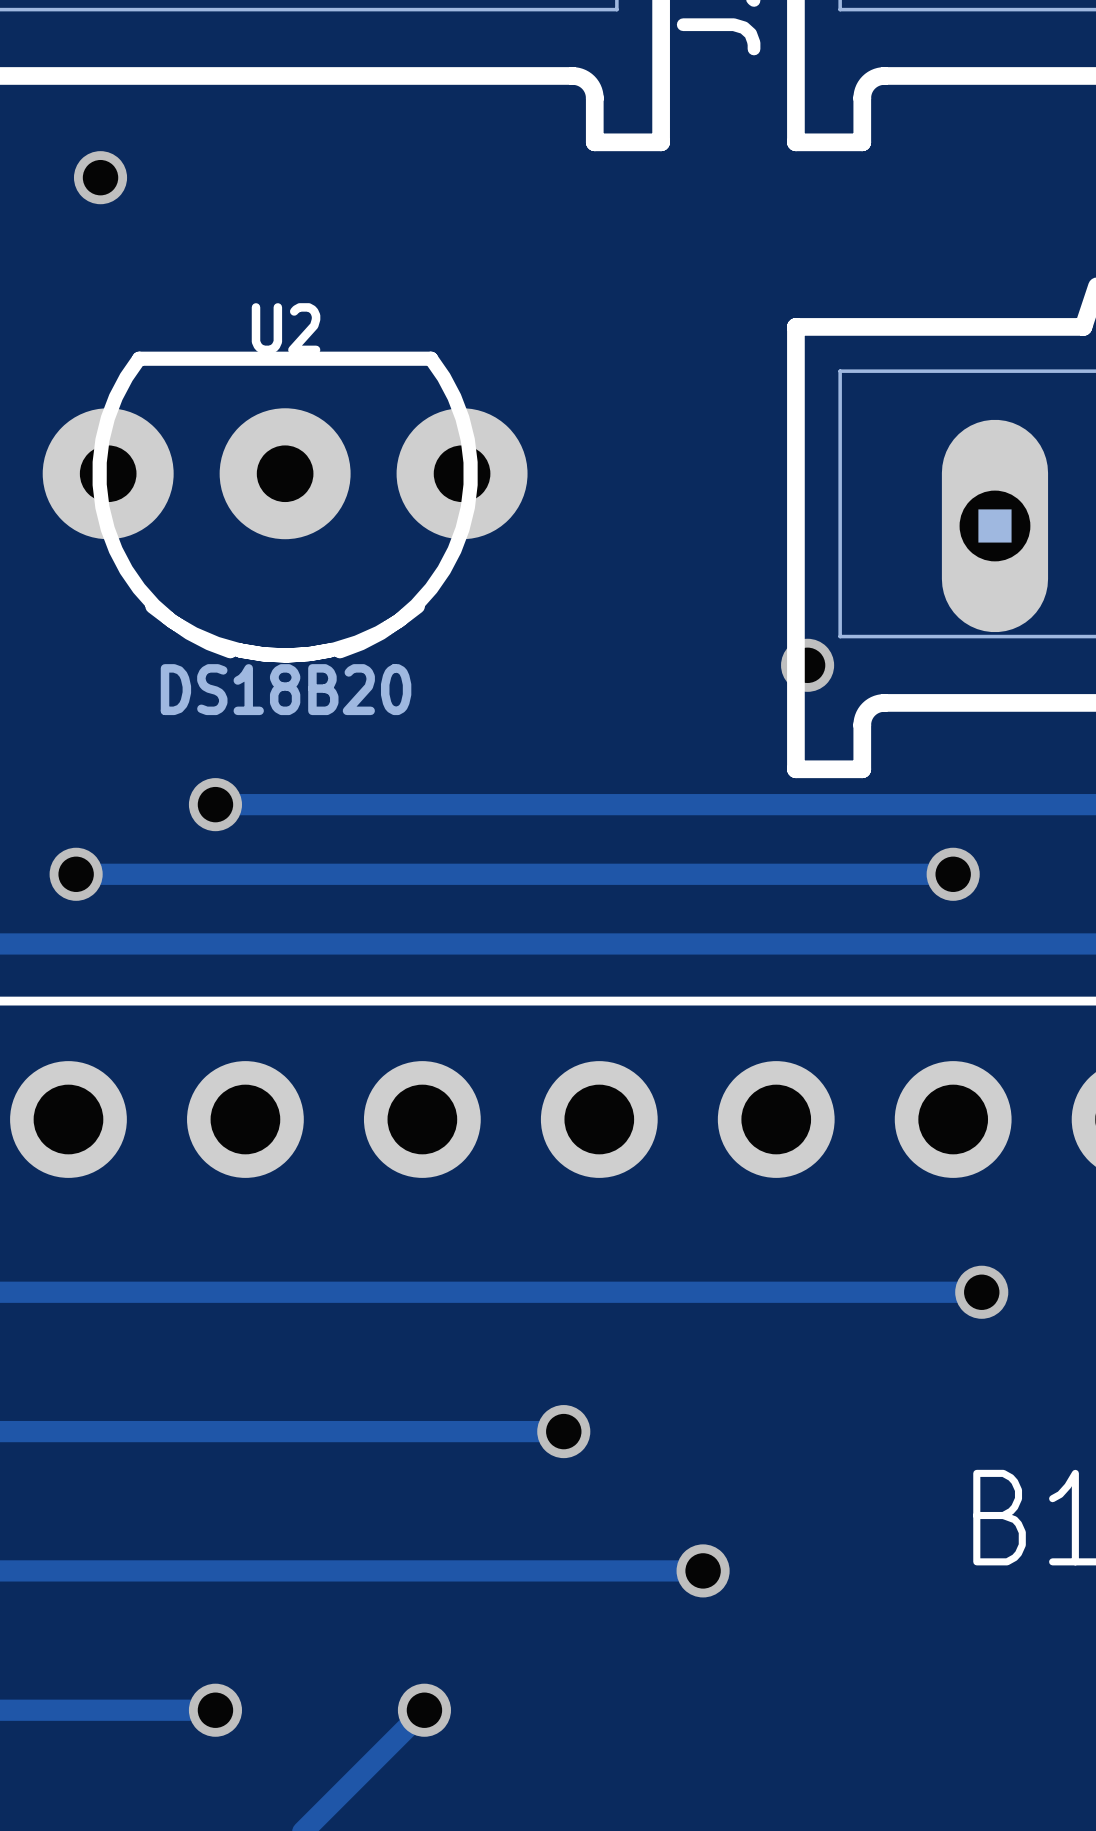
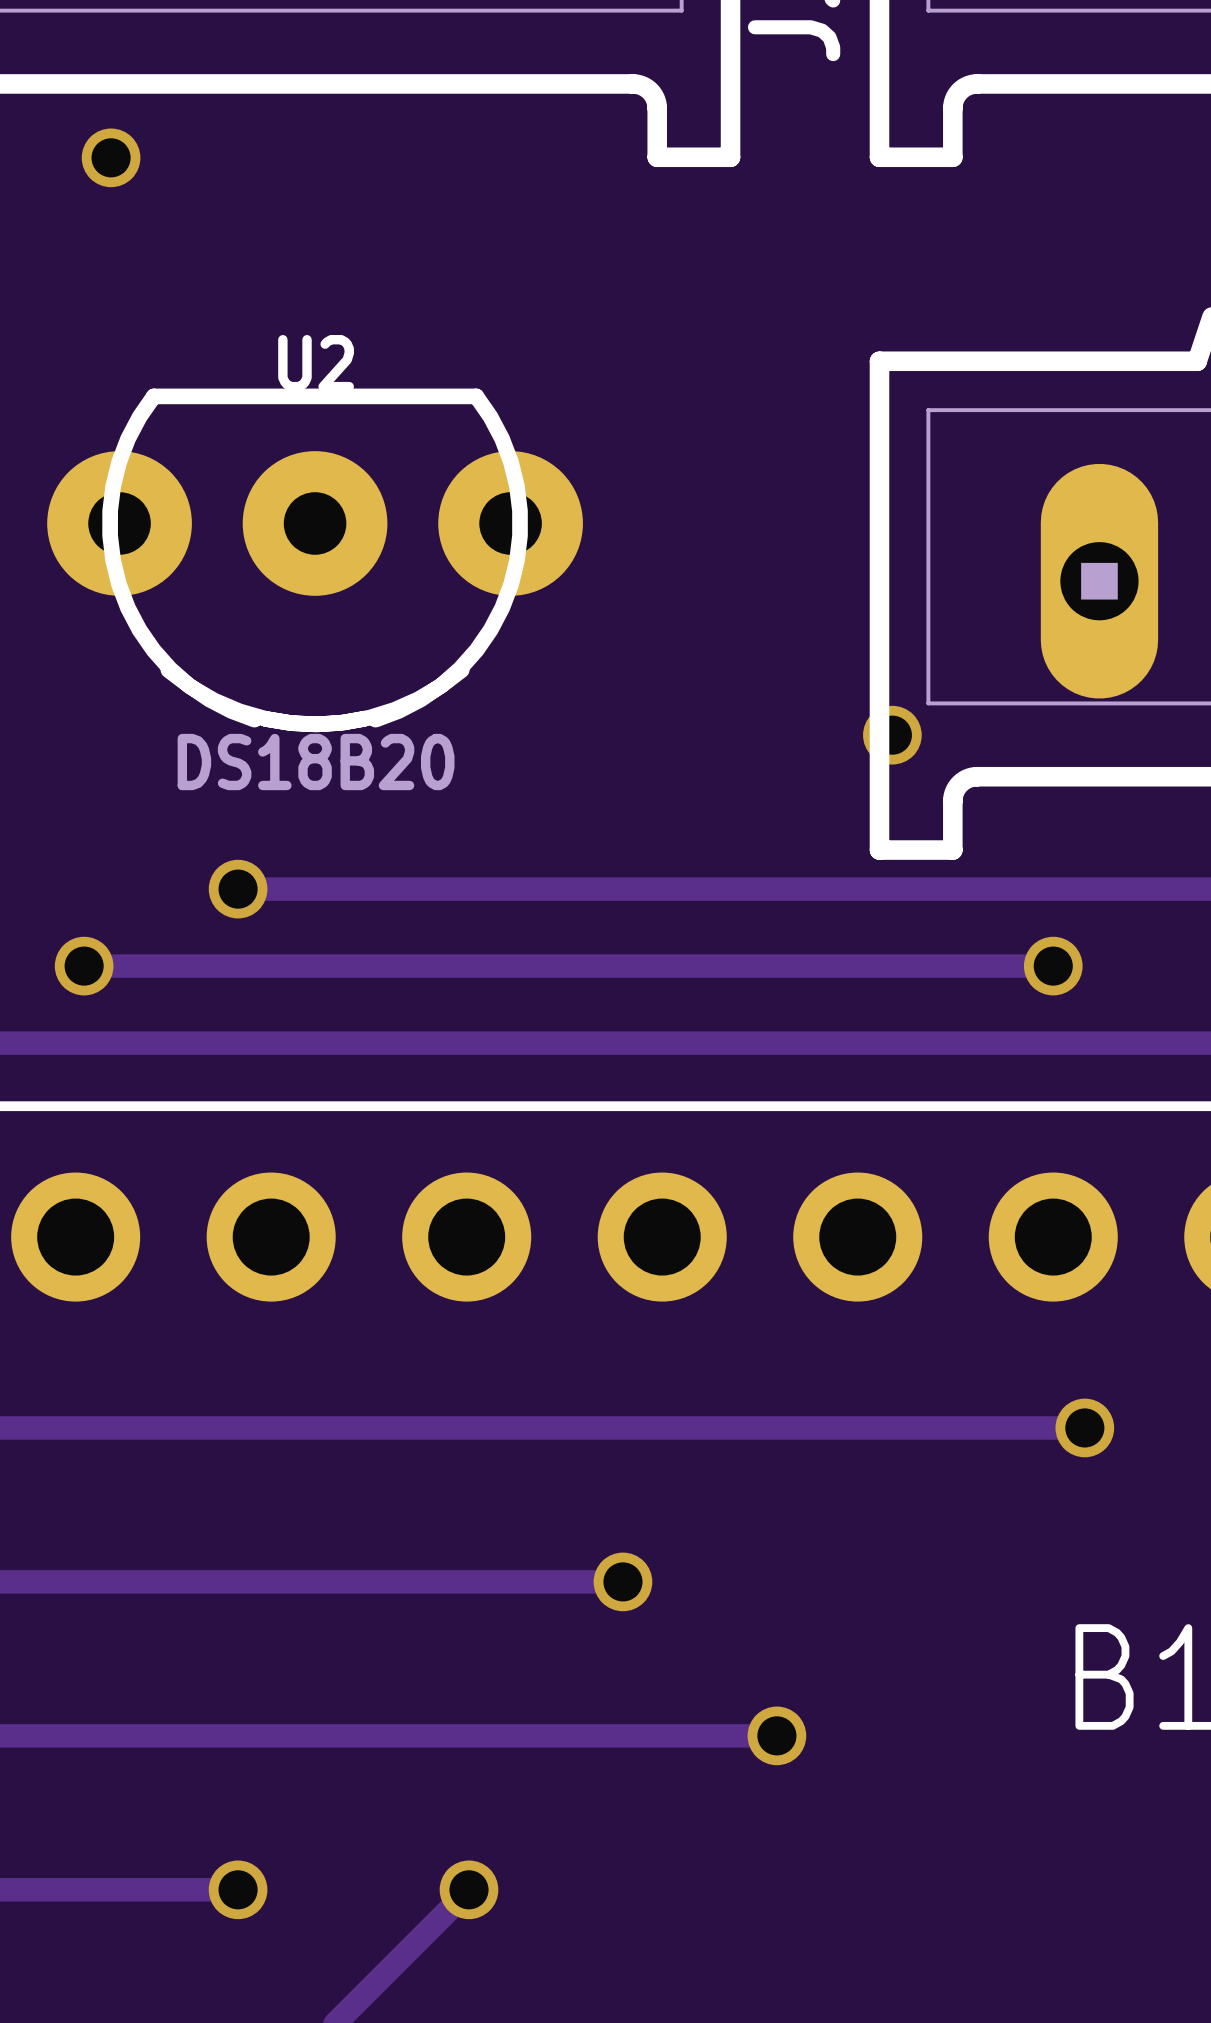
via position: (100, 177) -> (111, 157)

